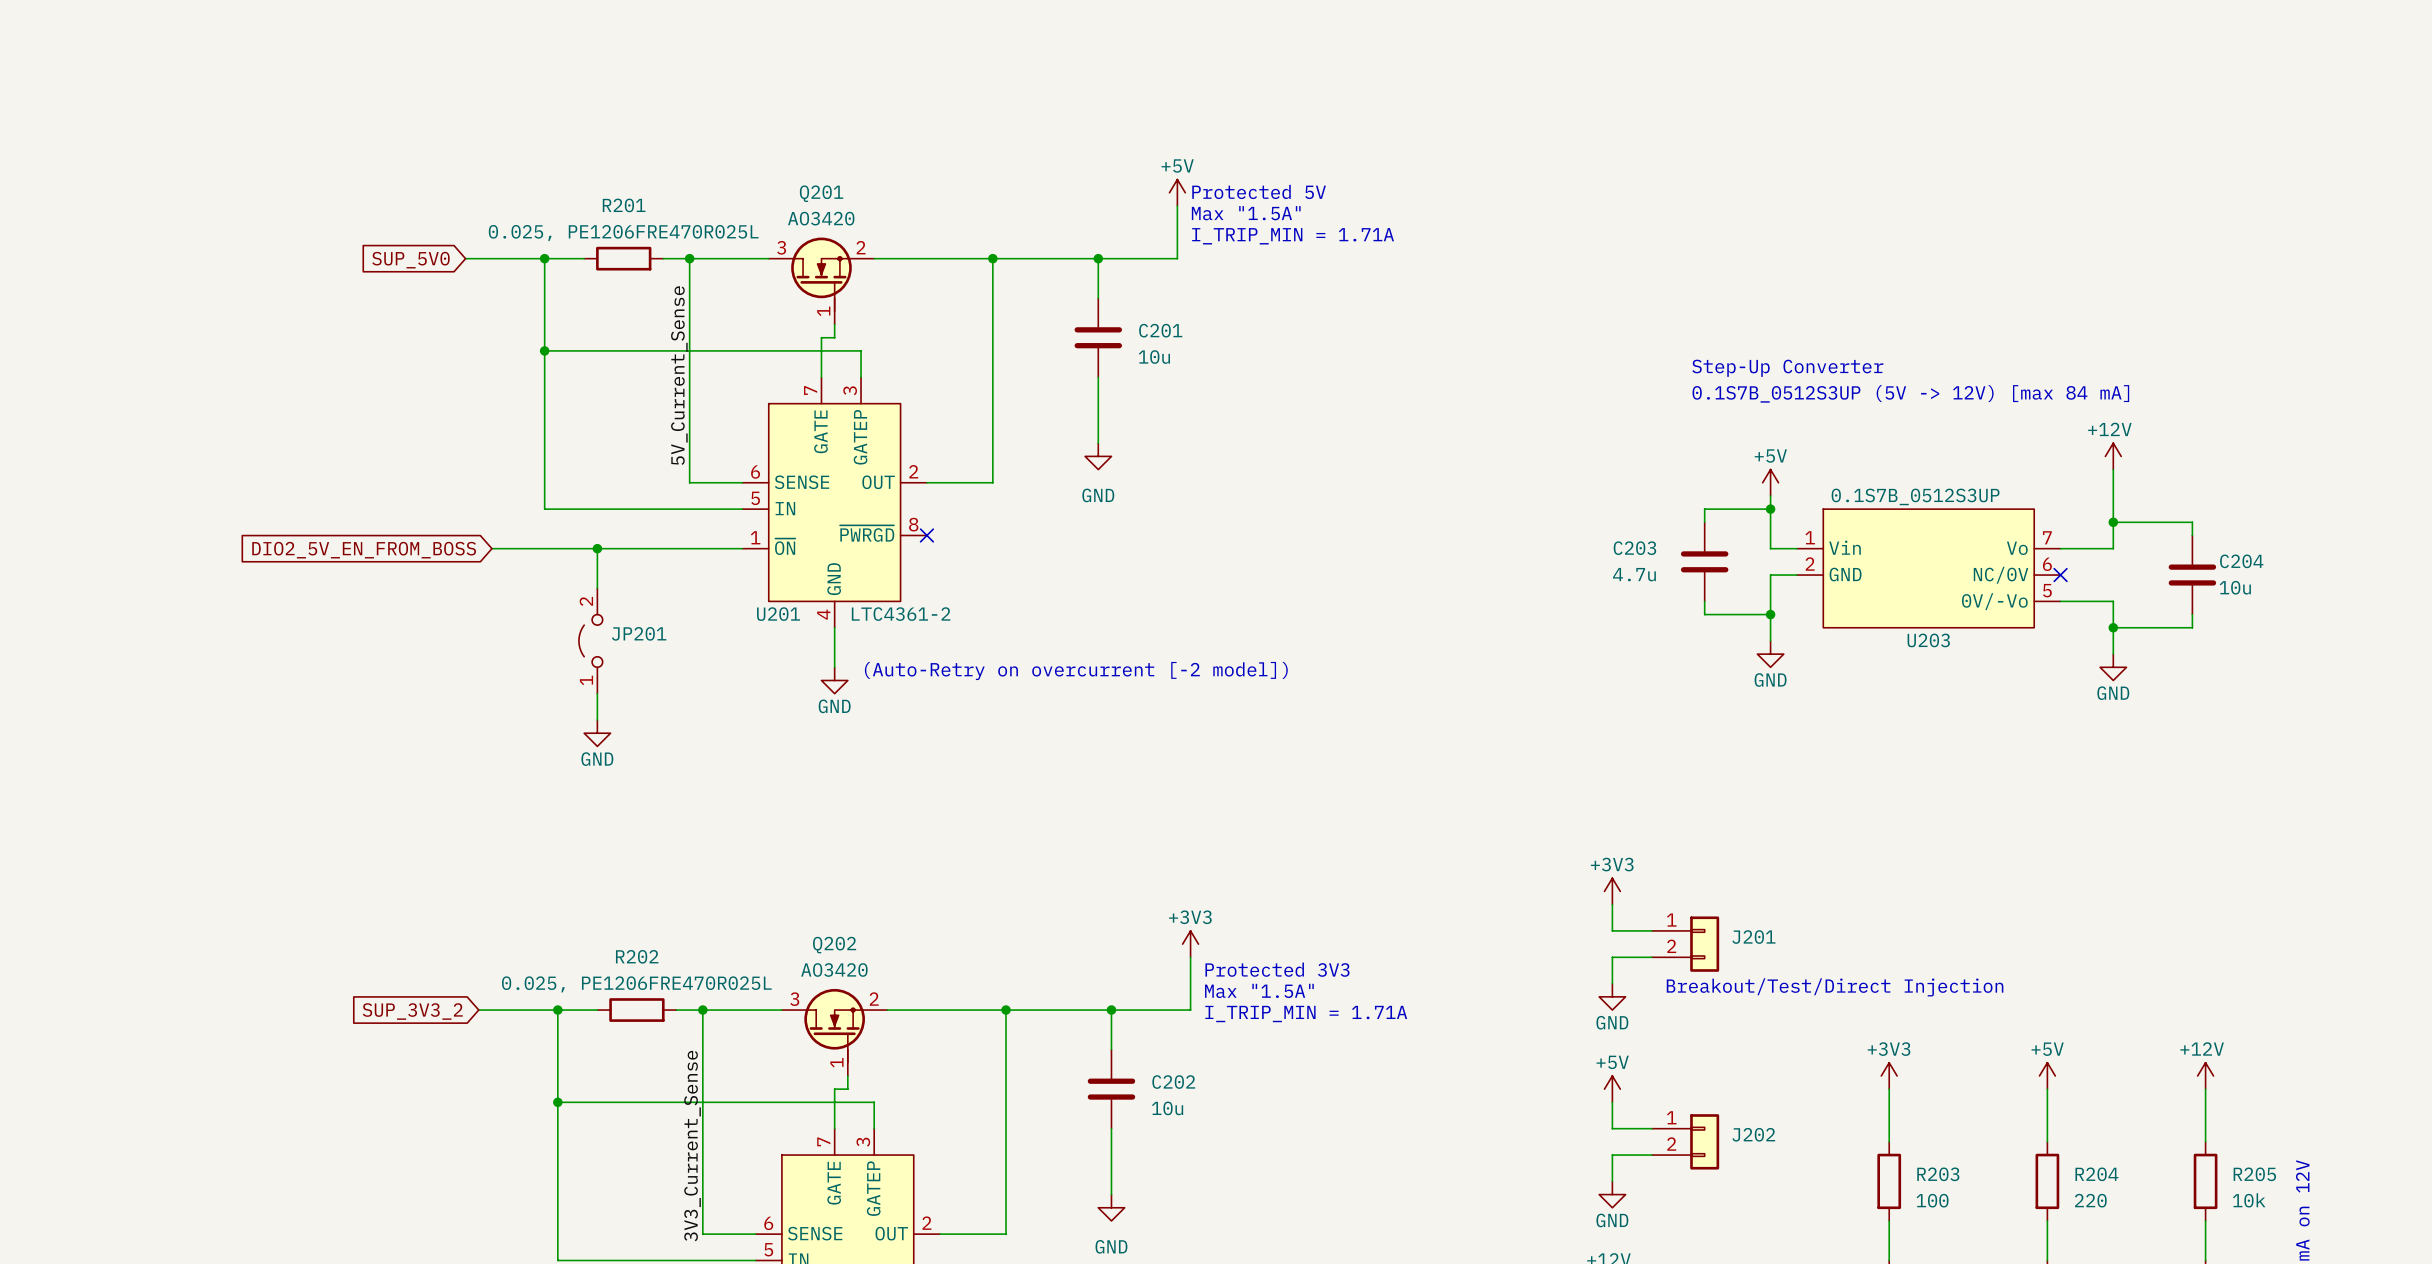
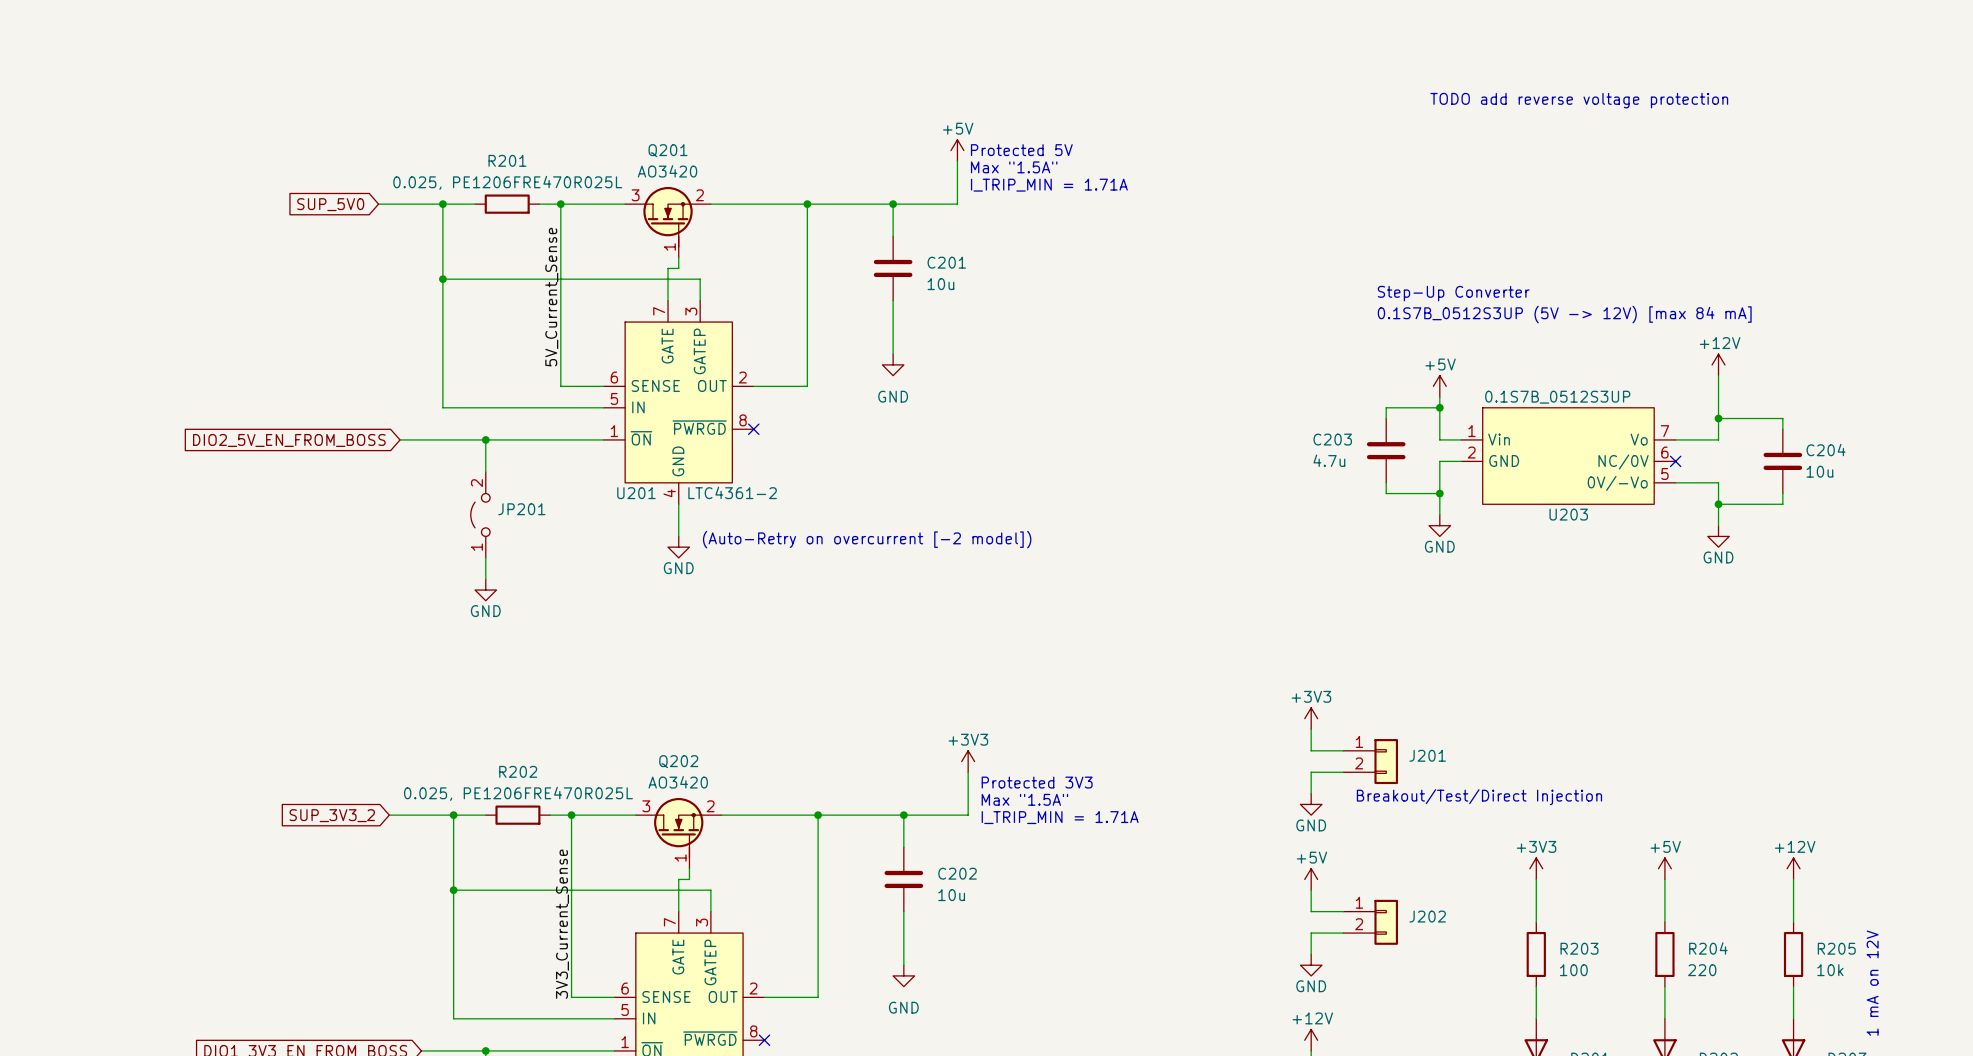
text: none -> TODO add reverse voltage protection (1579, 100)

